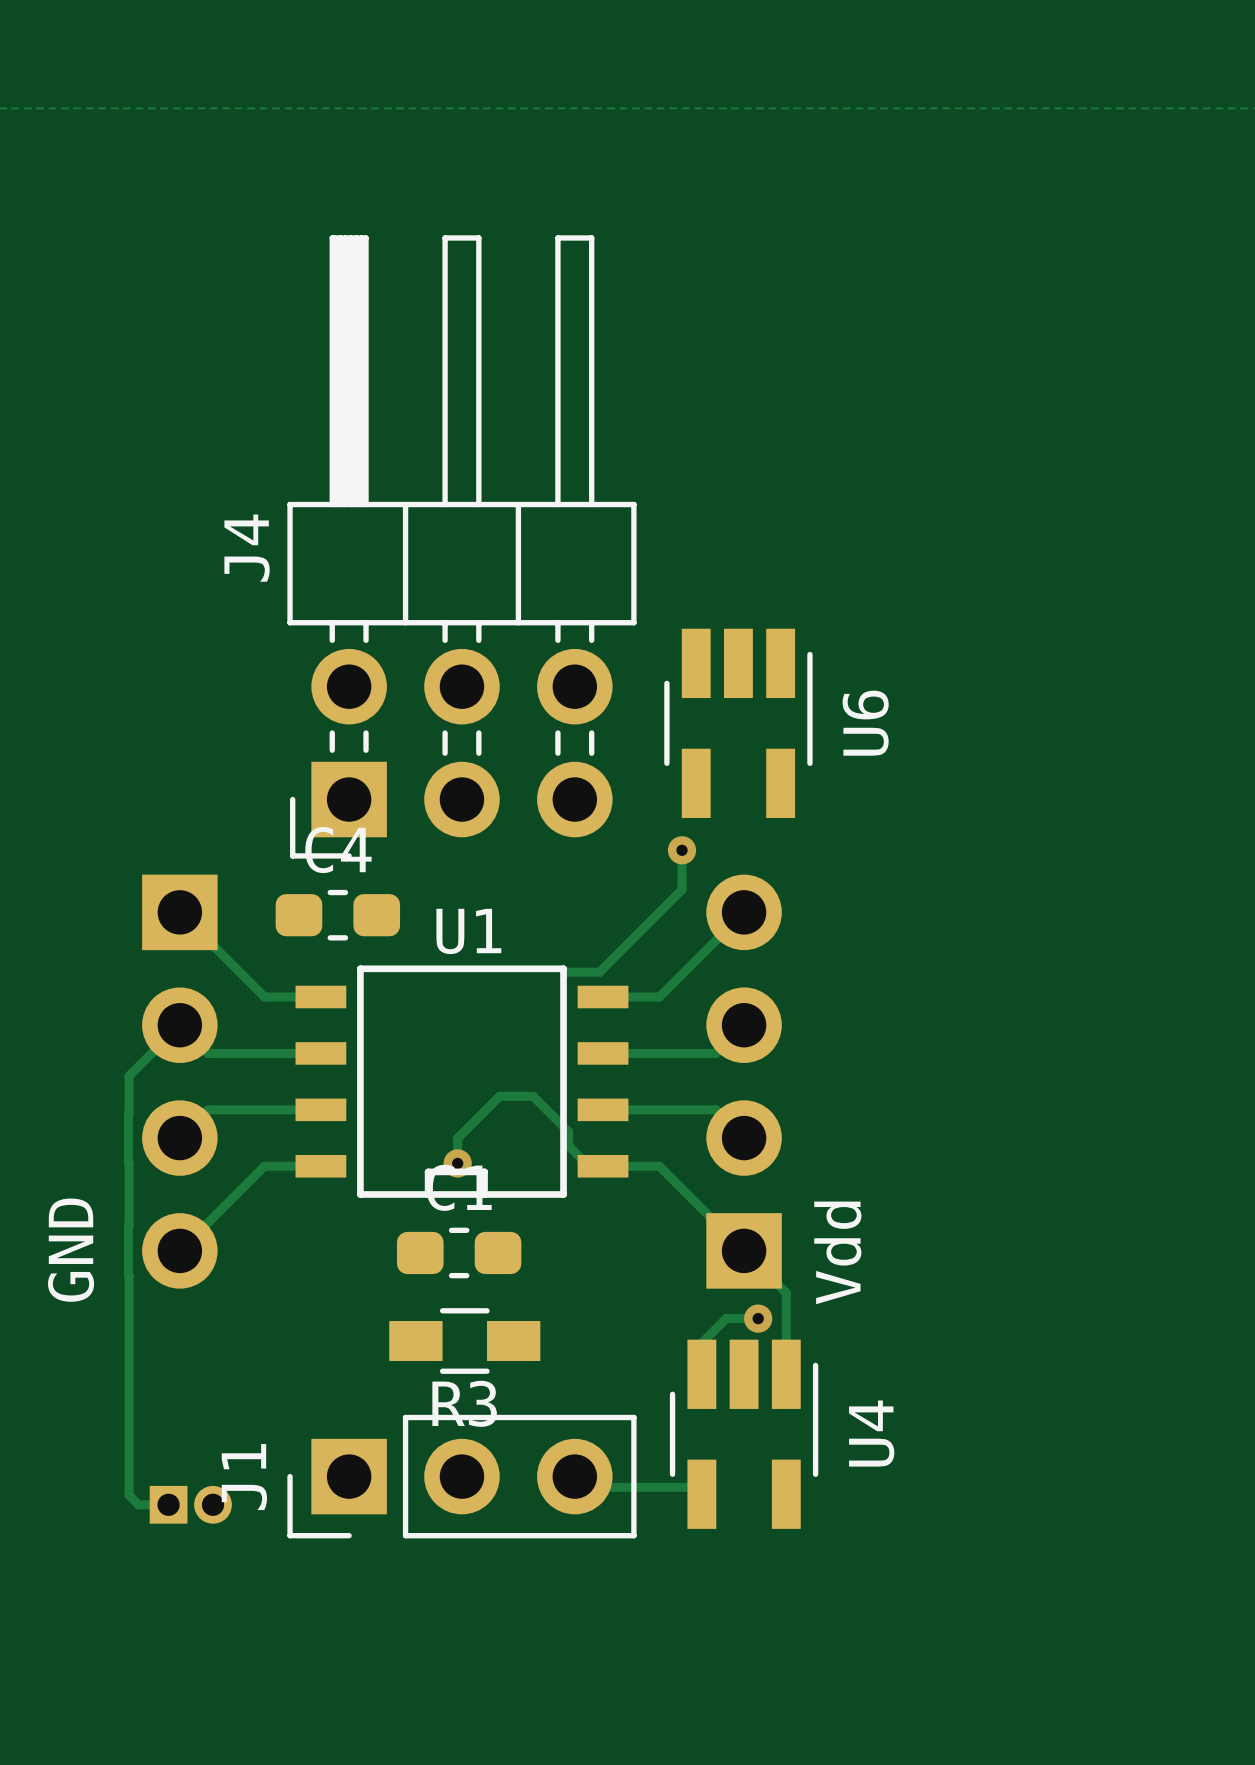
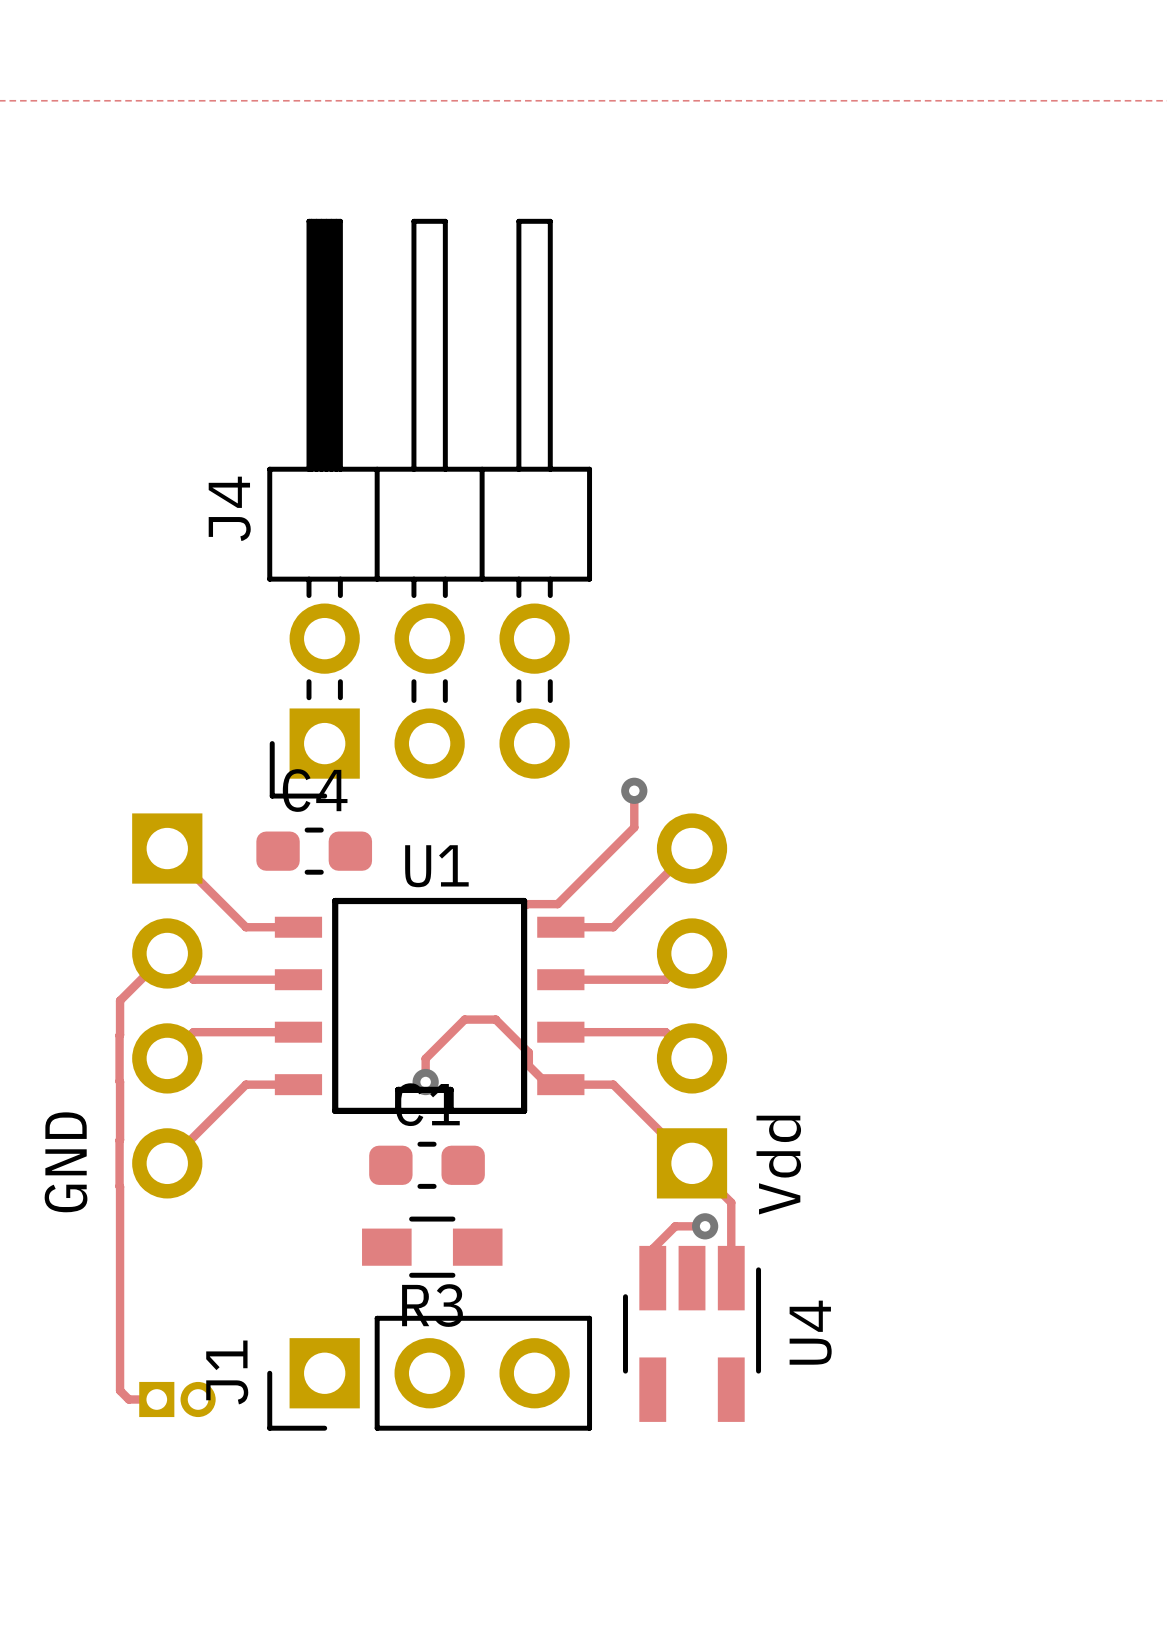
U6: (738, 723) -> none
track: (574, 1476) (585, 1487) (701, 1487) -> none

